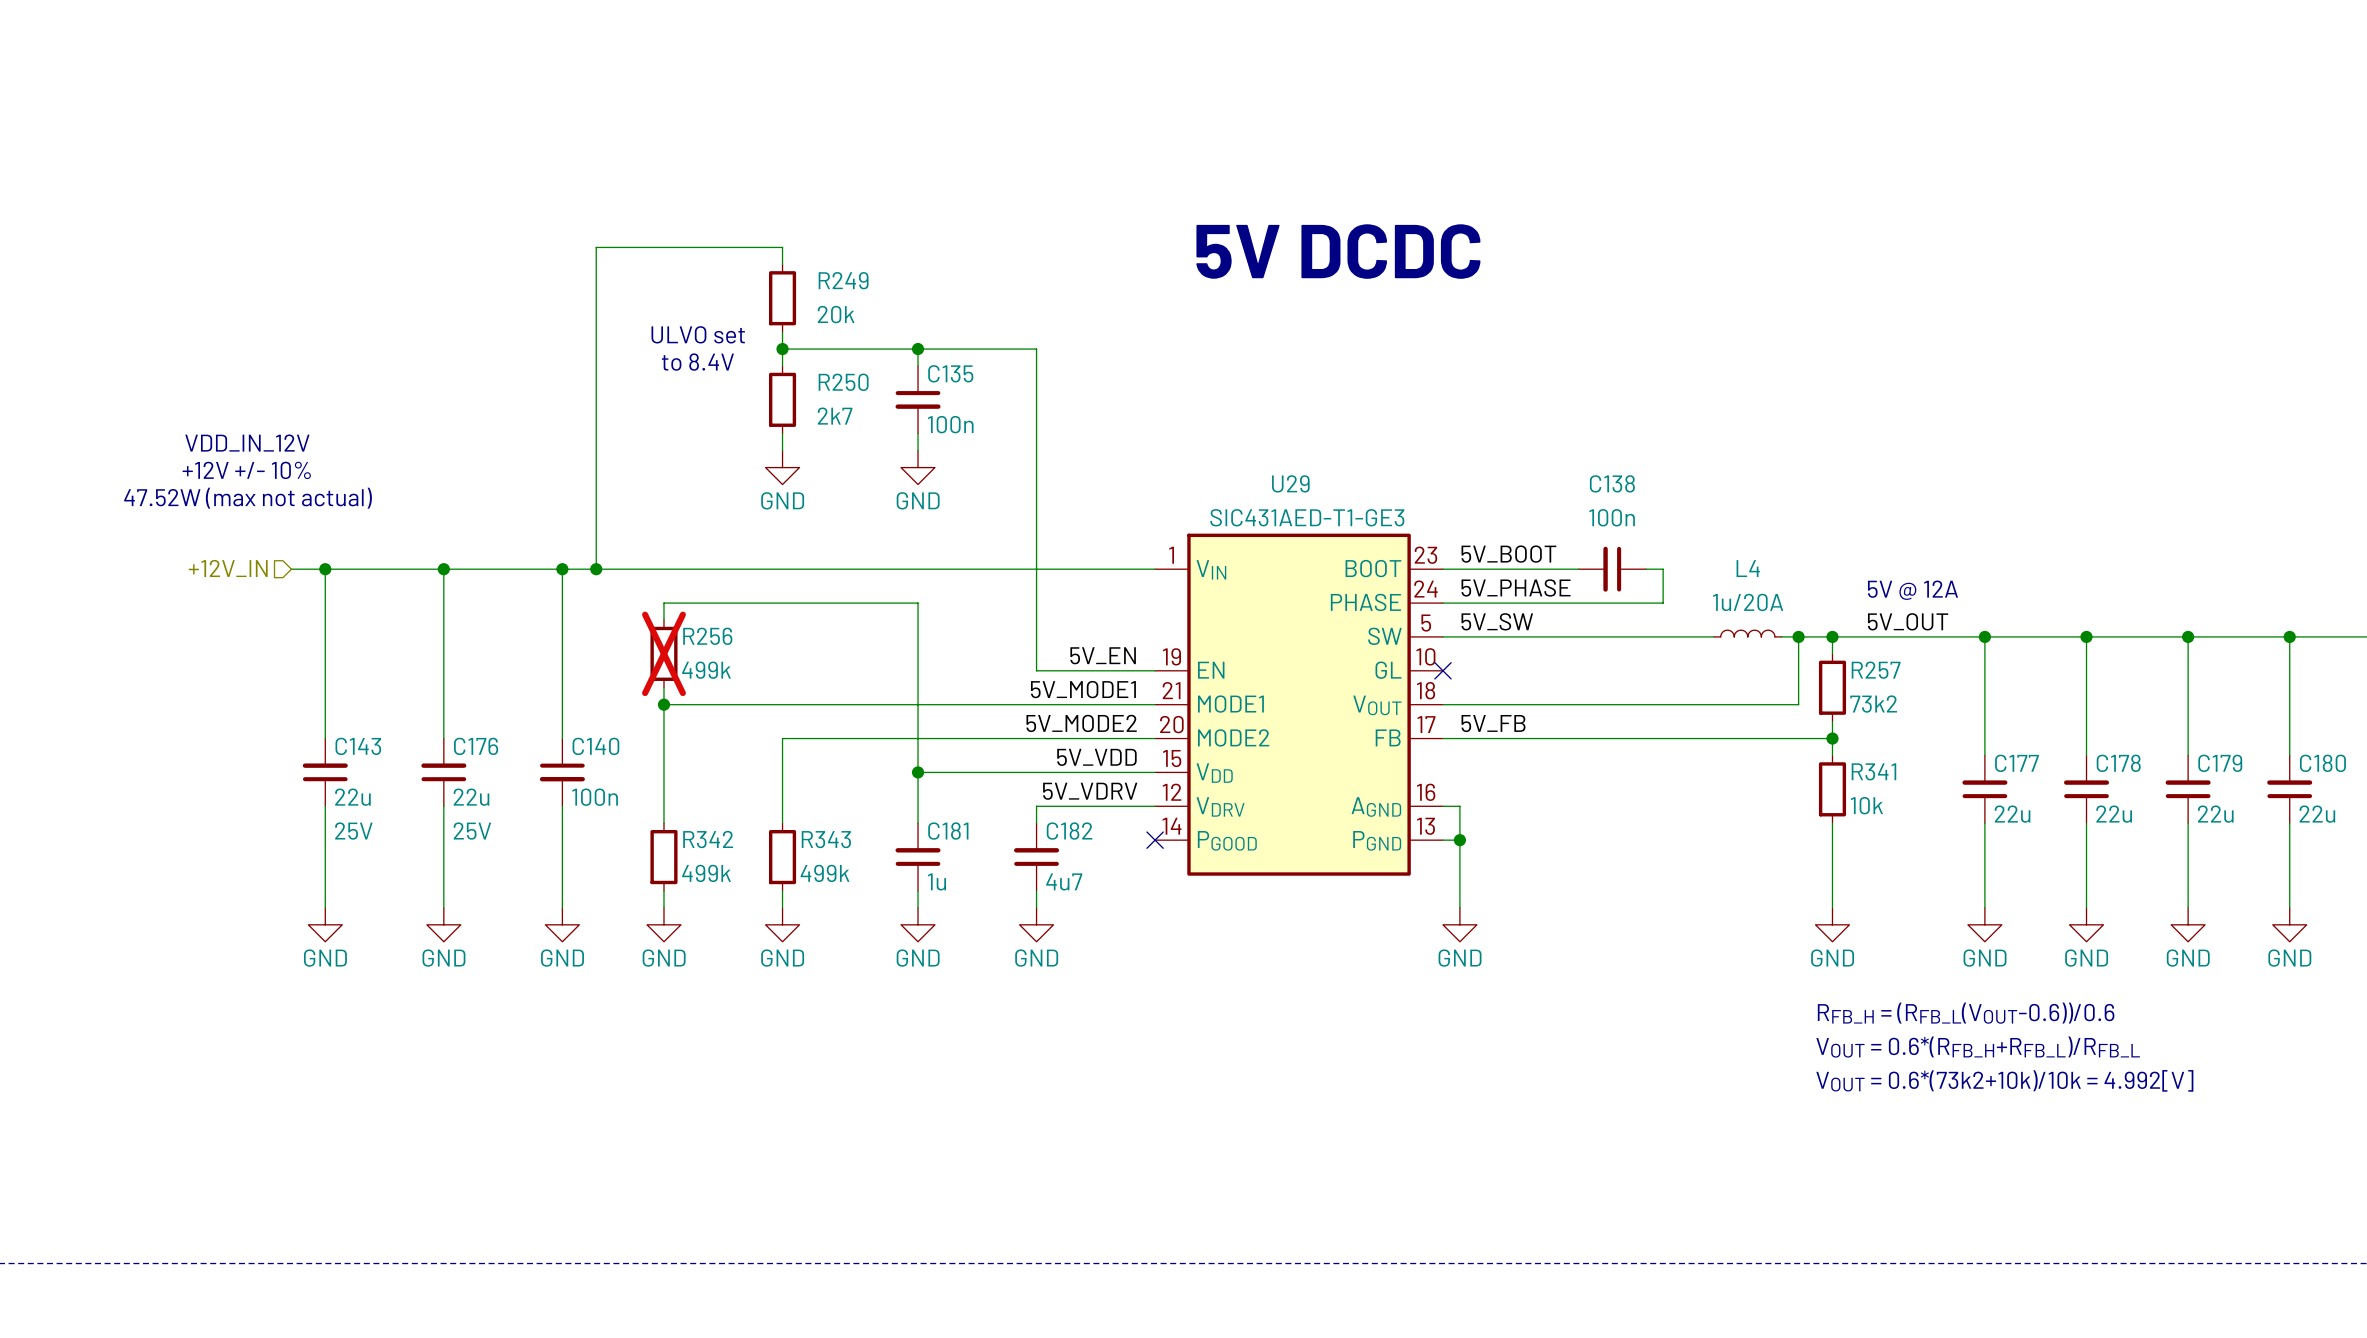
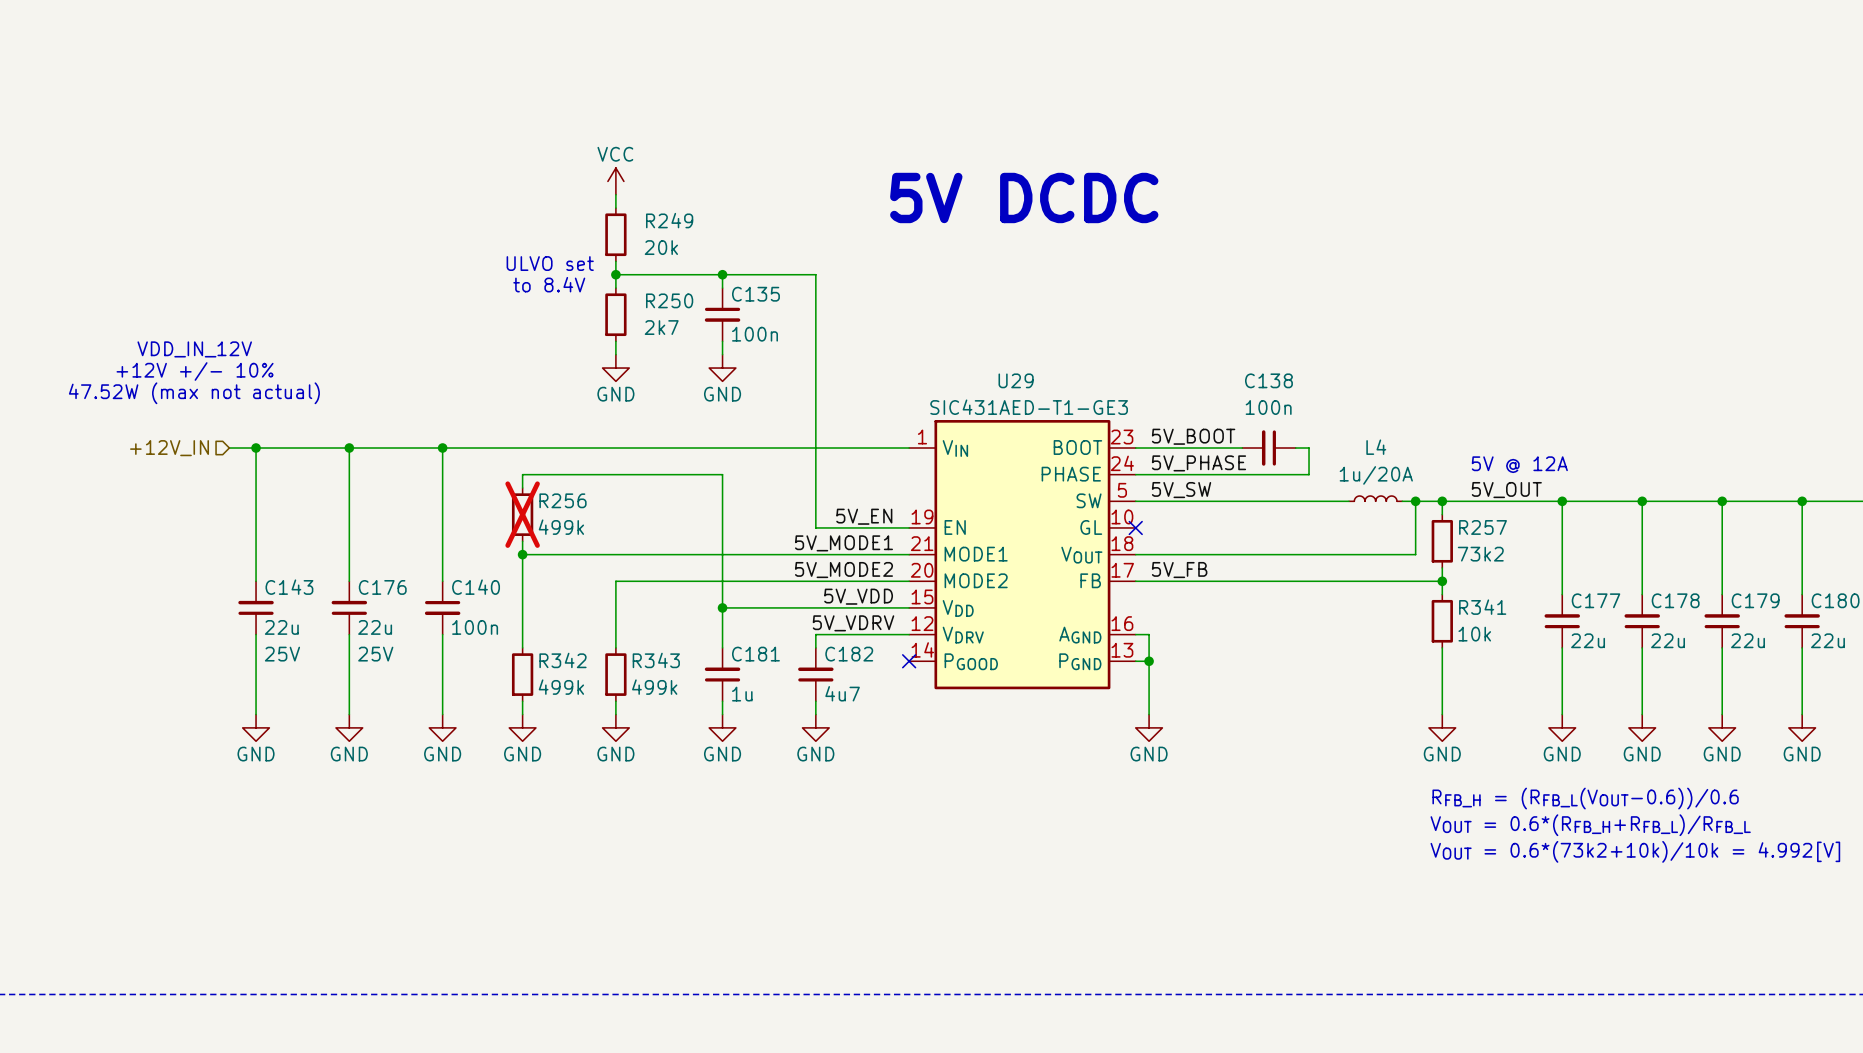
power symbol: none -> VCC (615, 181)
wire: (782, 247) (596, 247) (596, 569) -> none
junction: (596, 569) -> none

